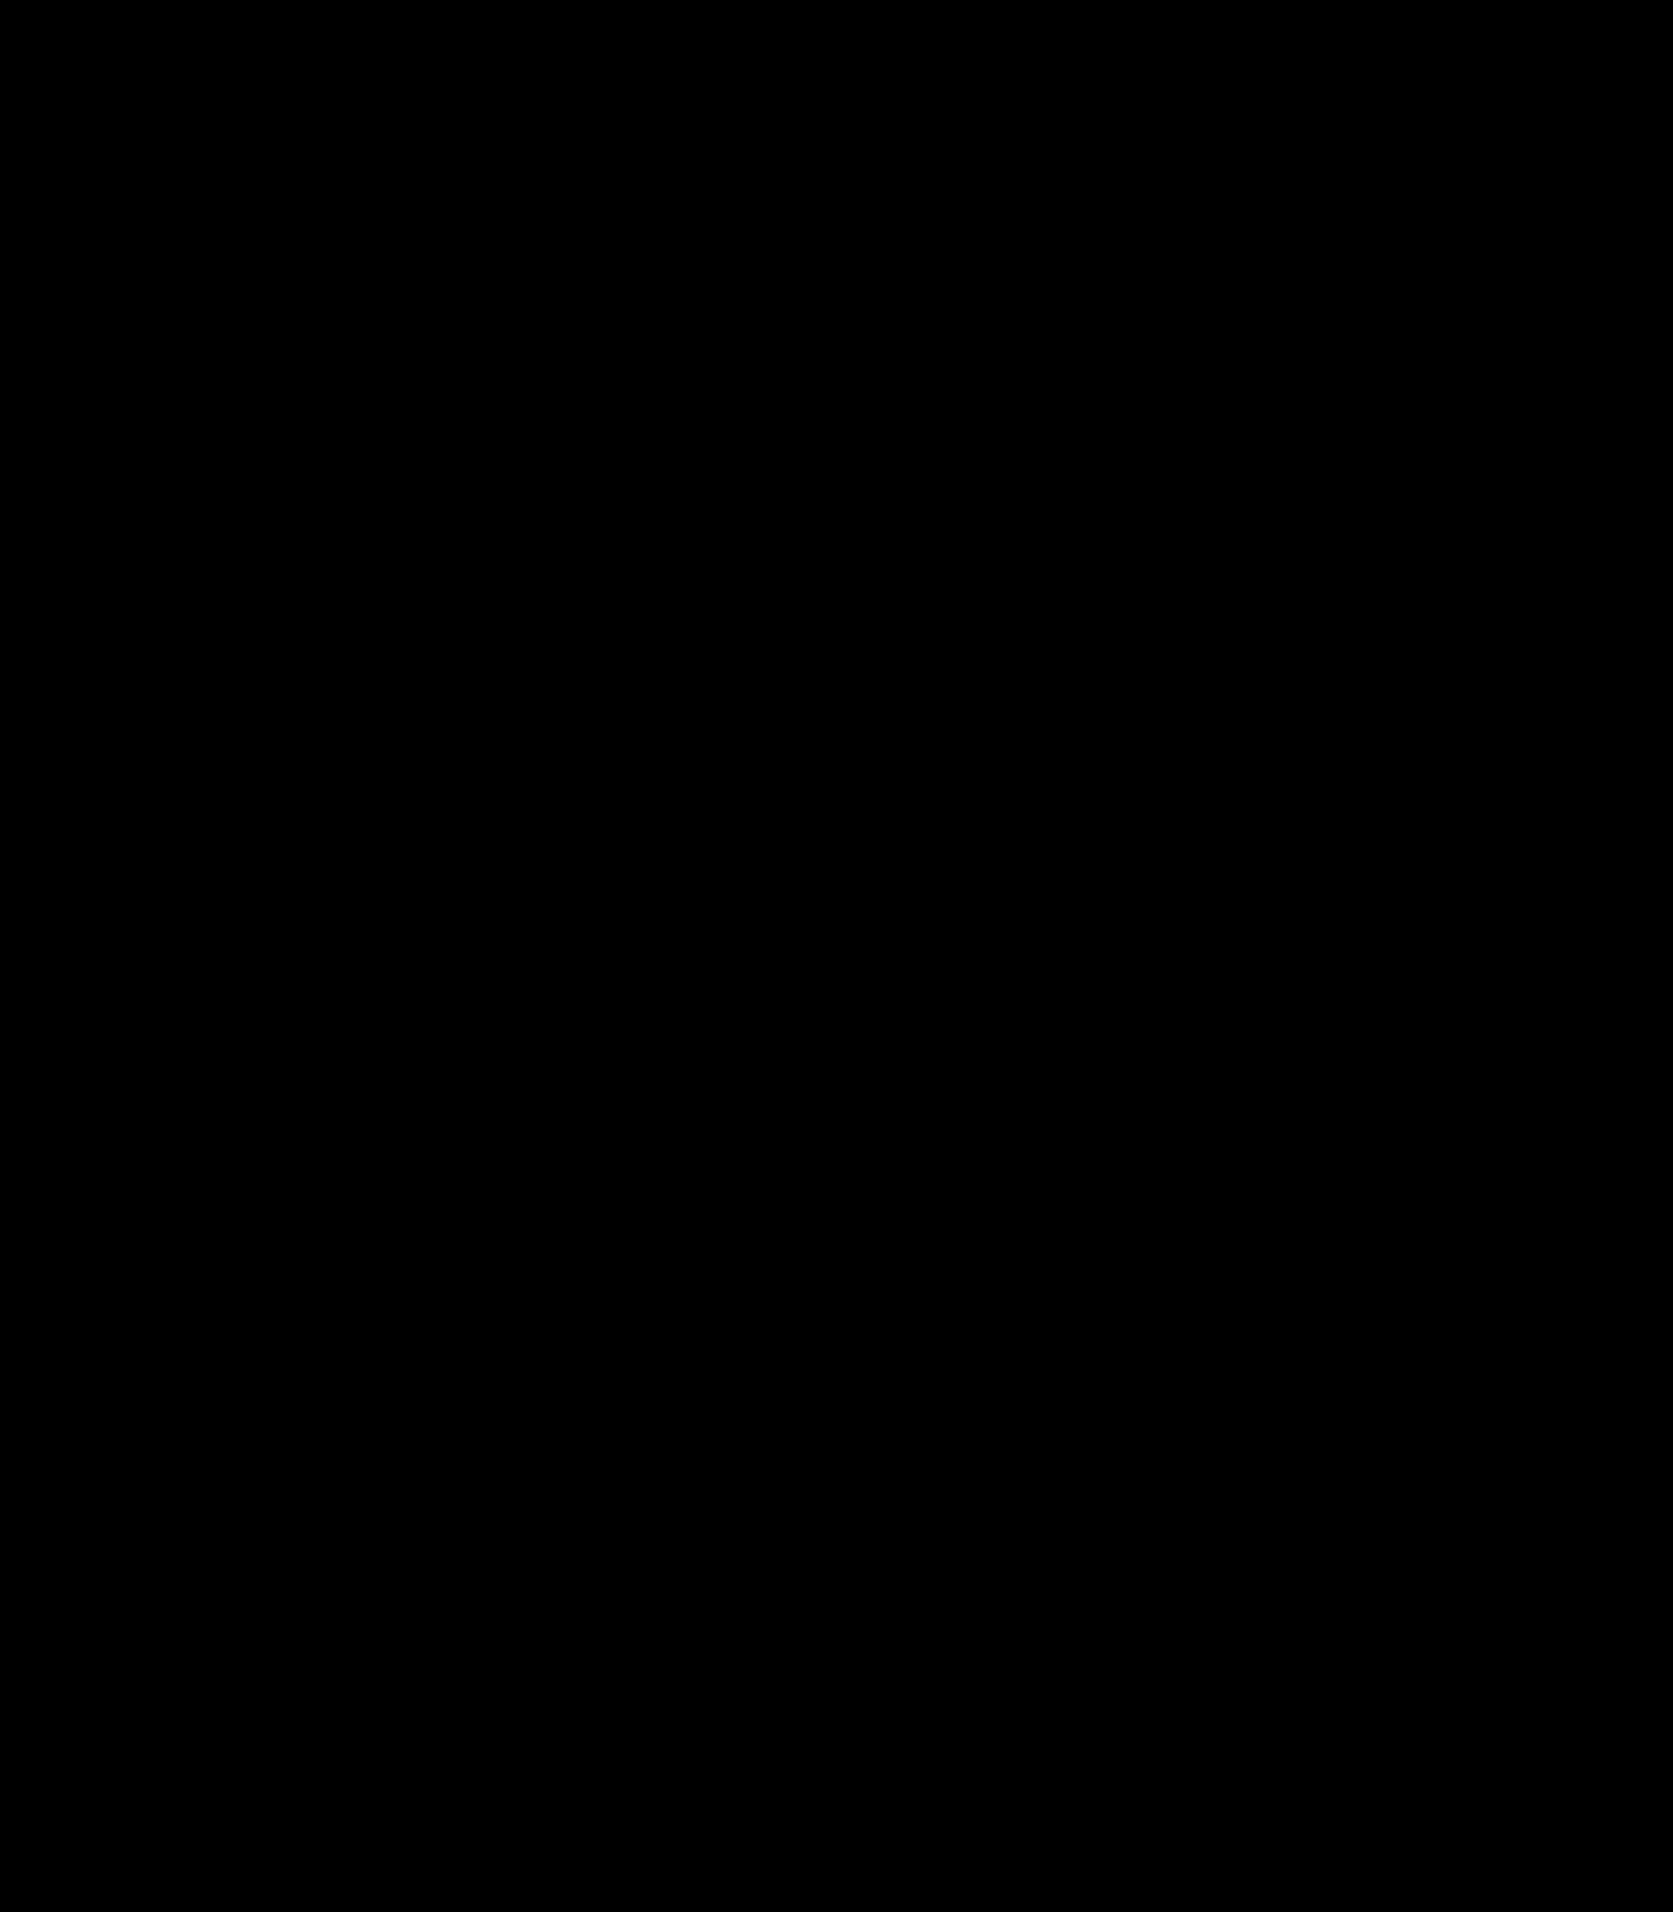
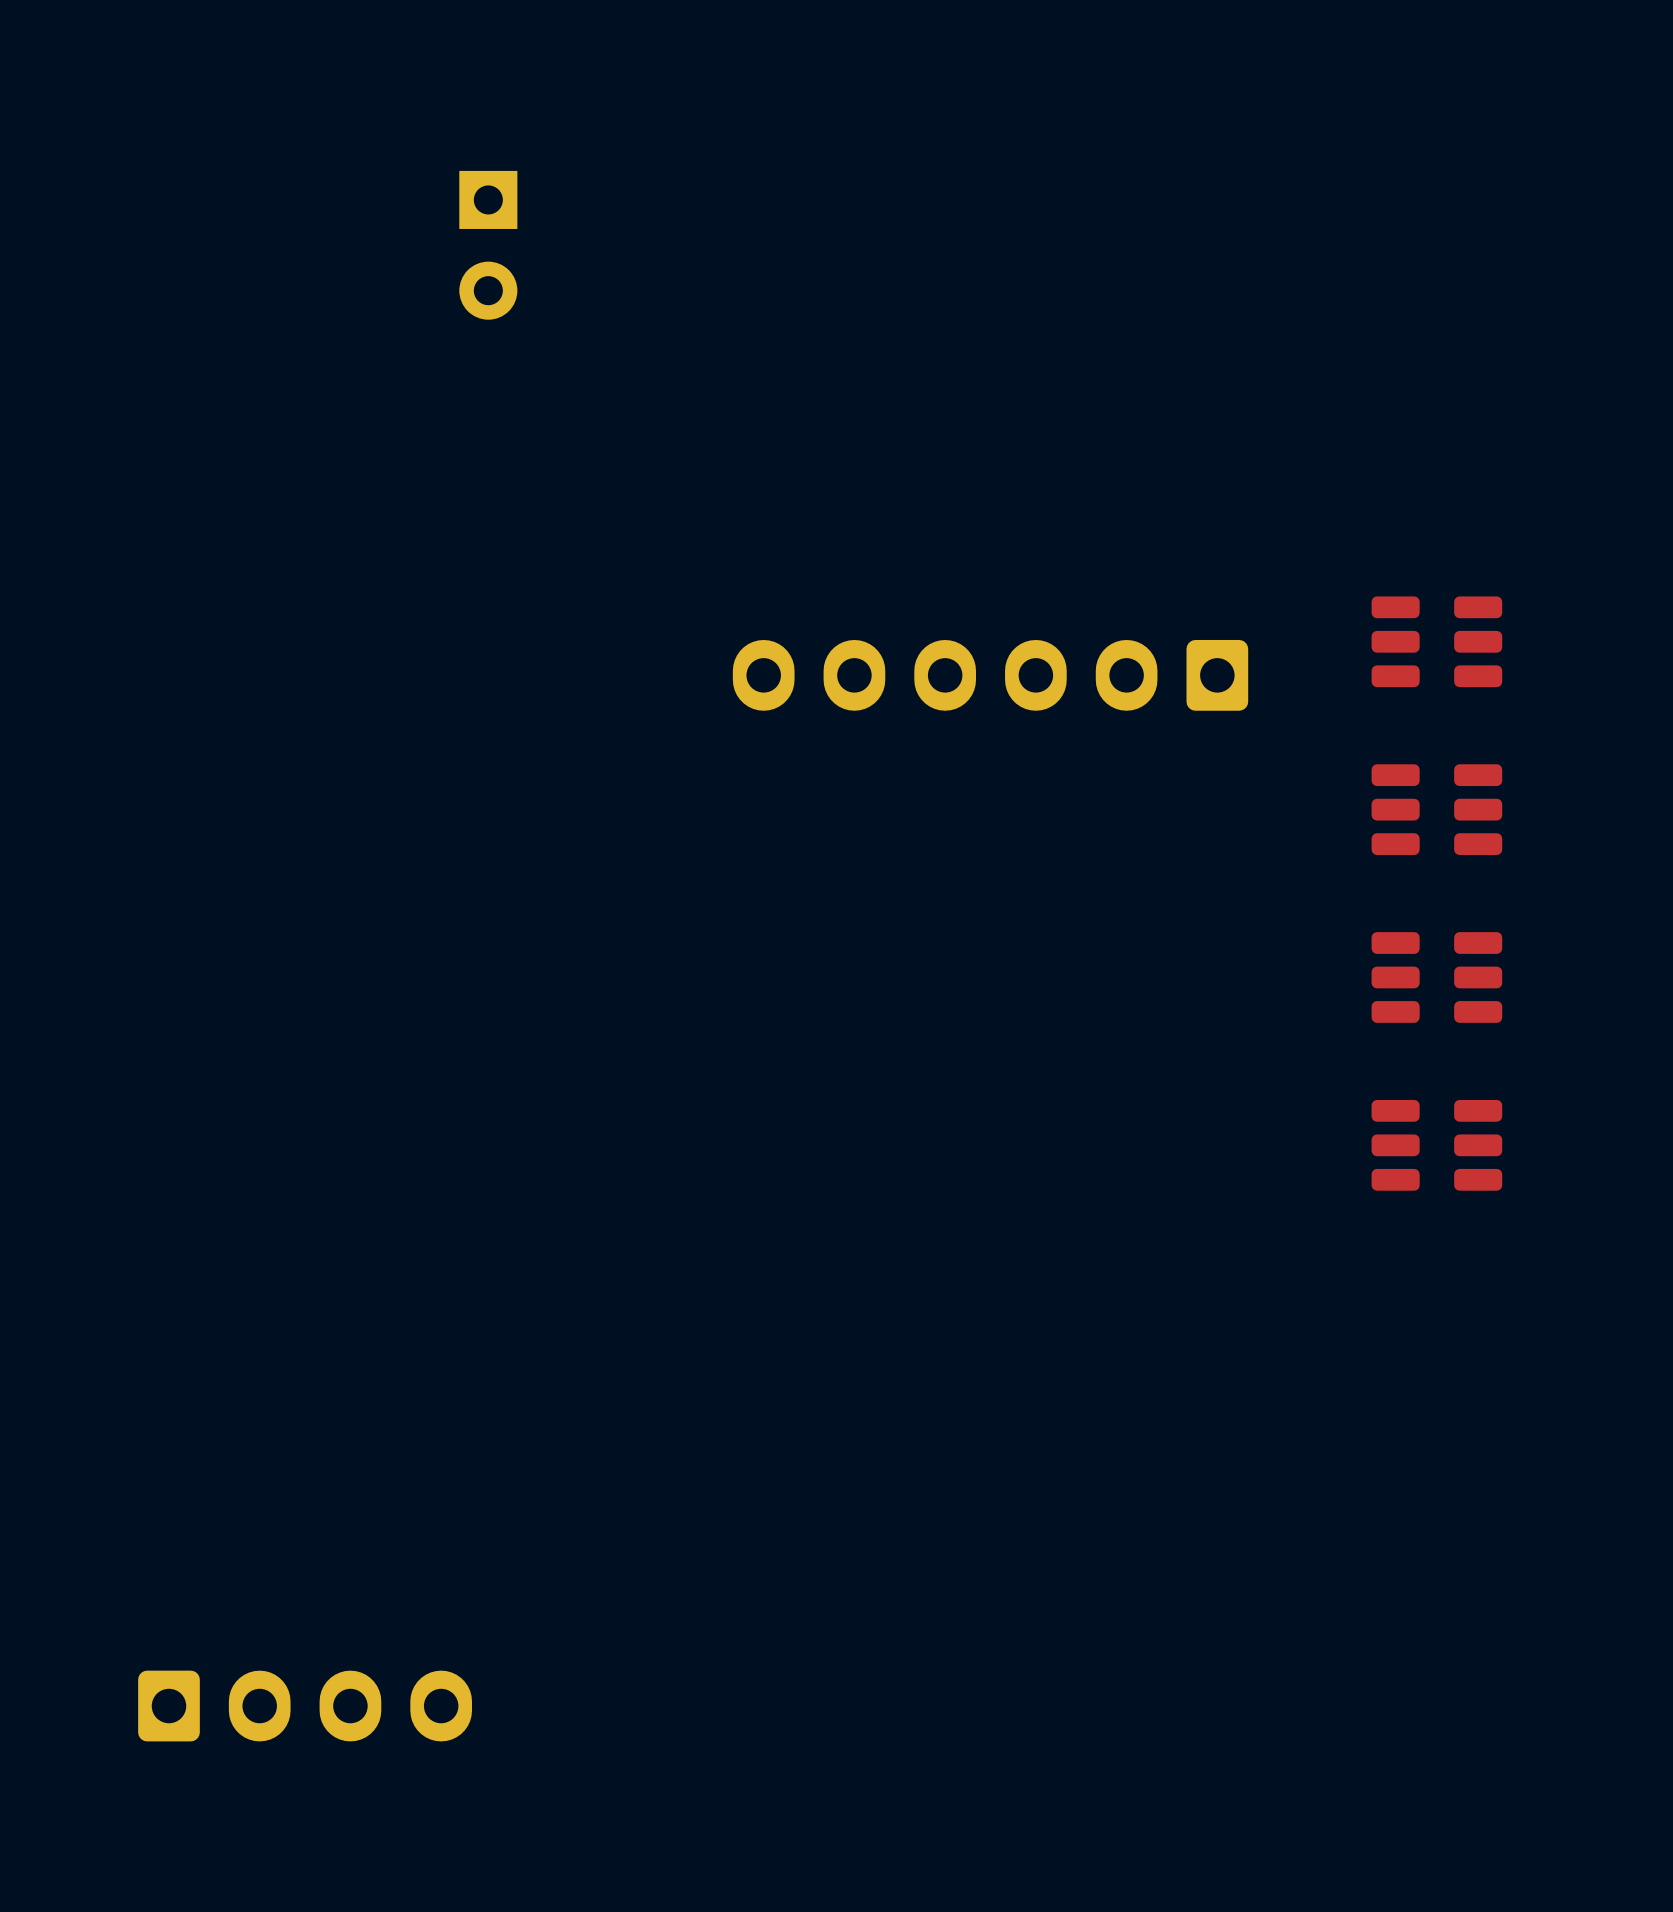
part: none -> (488, 245)
part: none -> (1436, 641)
part: none -> (990, 675)
part: none -> (1436, 809)
part: none -> (1436, 977)
part: none -> (1436, 1145)
part: none -> (305, 1706)

